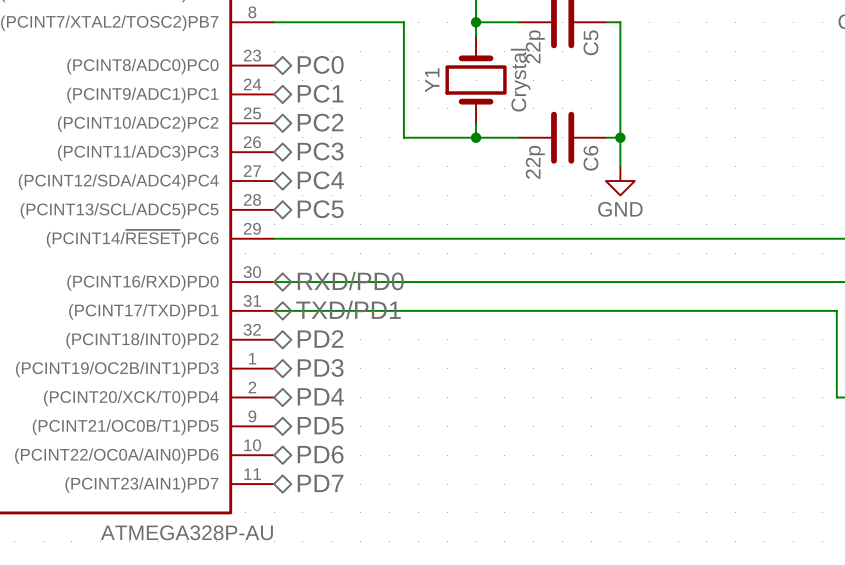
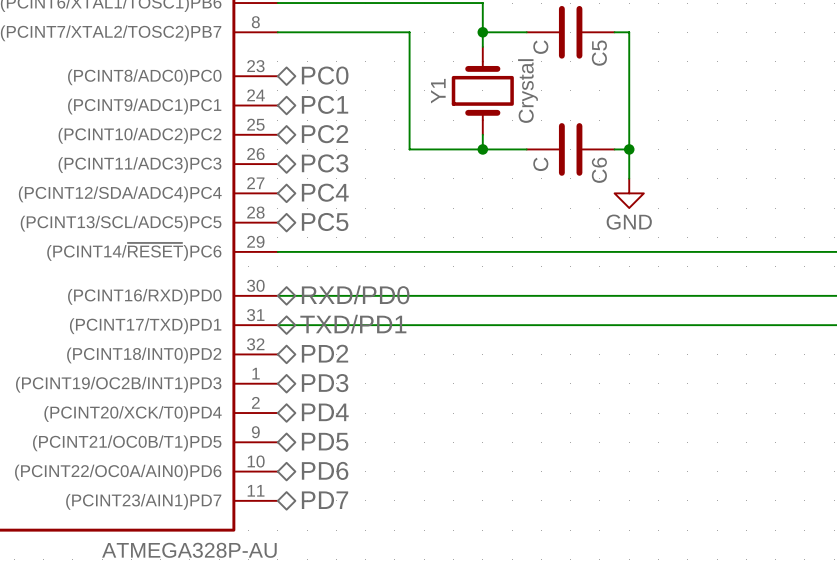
C5 value: 22p (535, 46) -> C (540, 47)
C6 value: 22p (535, 162) -> C (540, 164)

